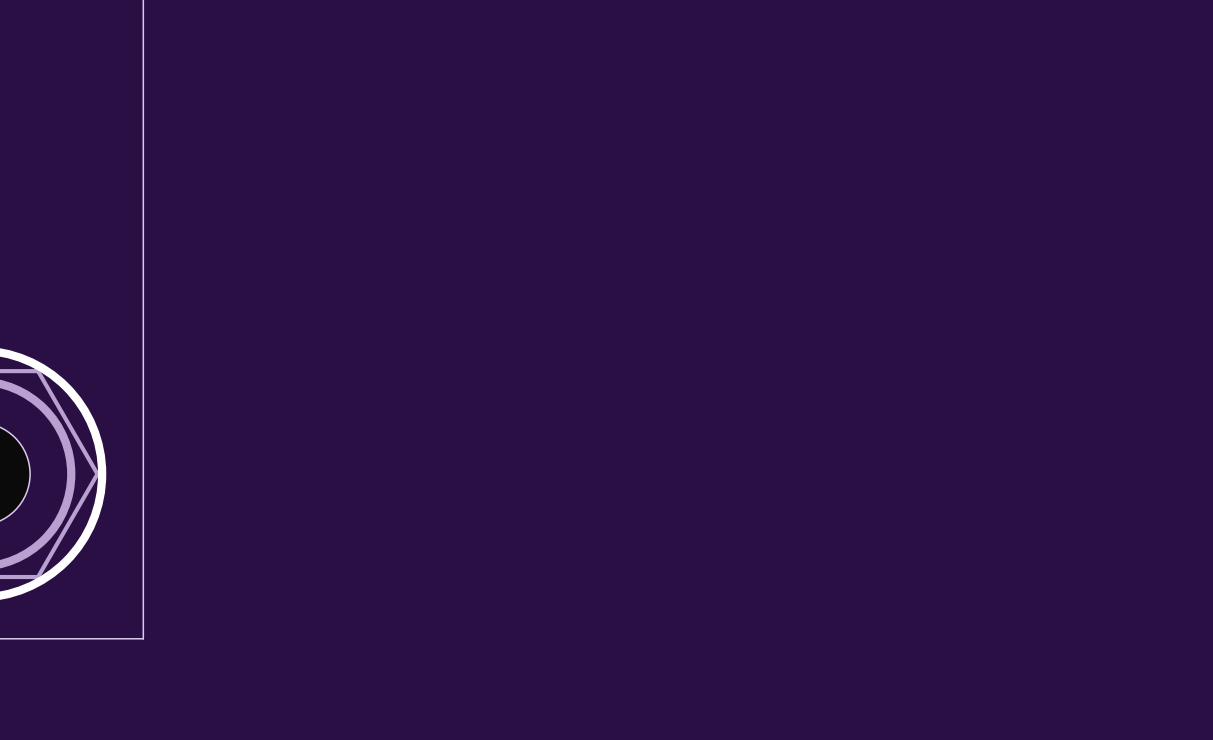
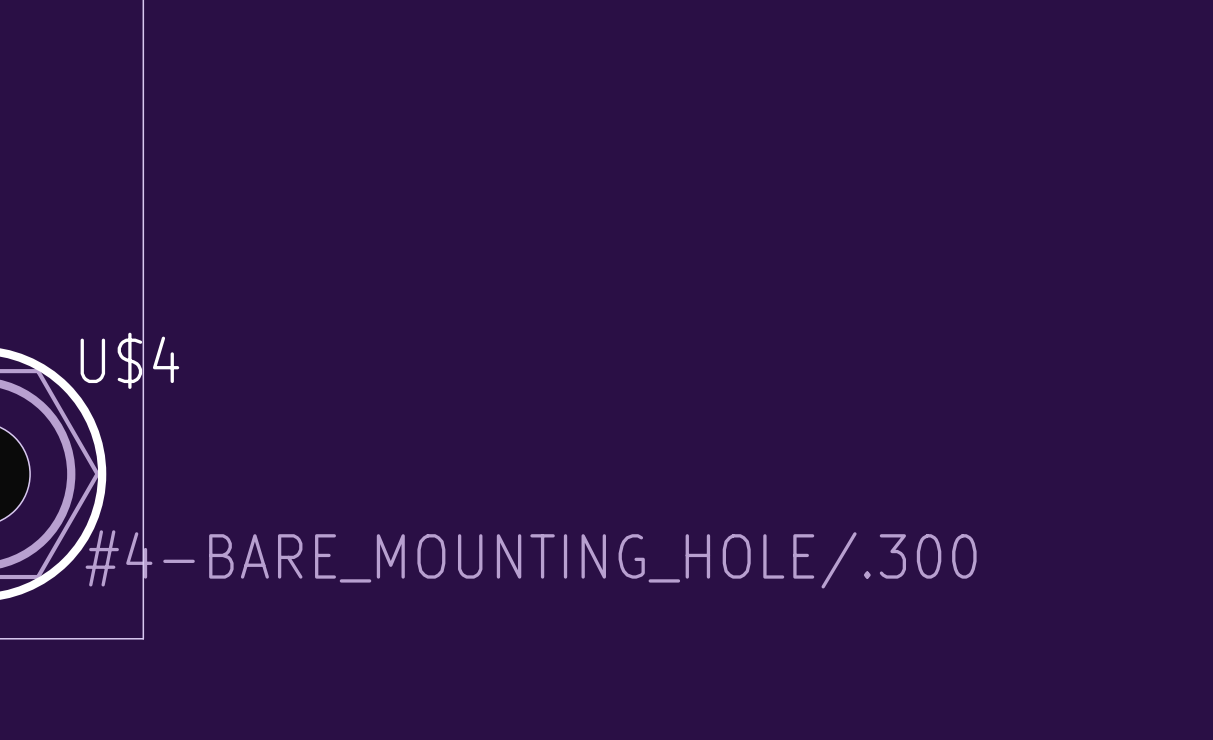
U$4 name: none -> U$4 (129, 360)
U$4 value: none -> #4-BARE_MOUNTING_HOLE/.300 (531, 559)

